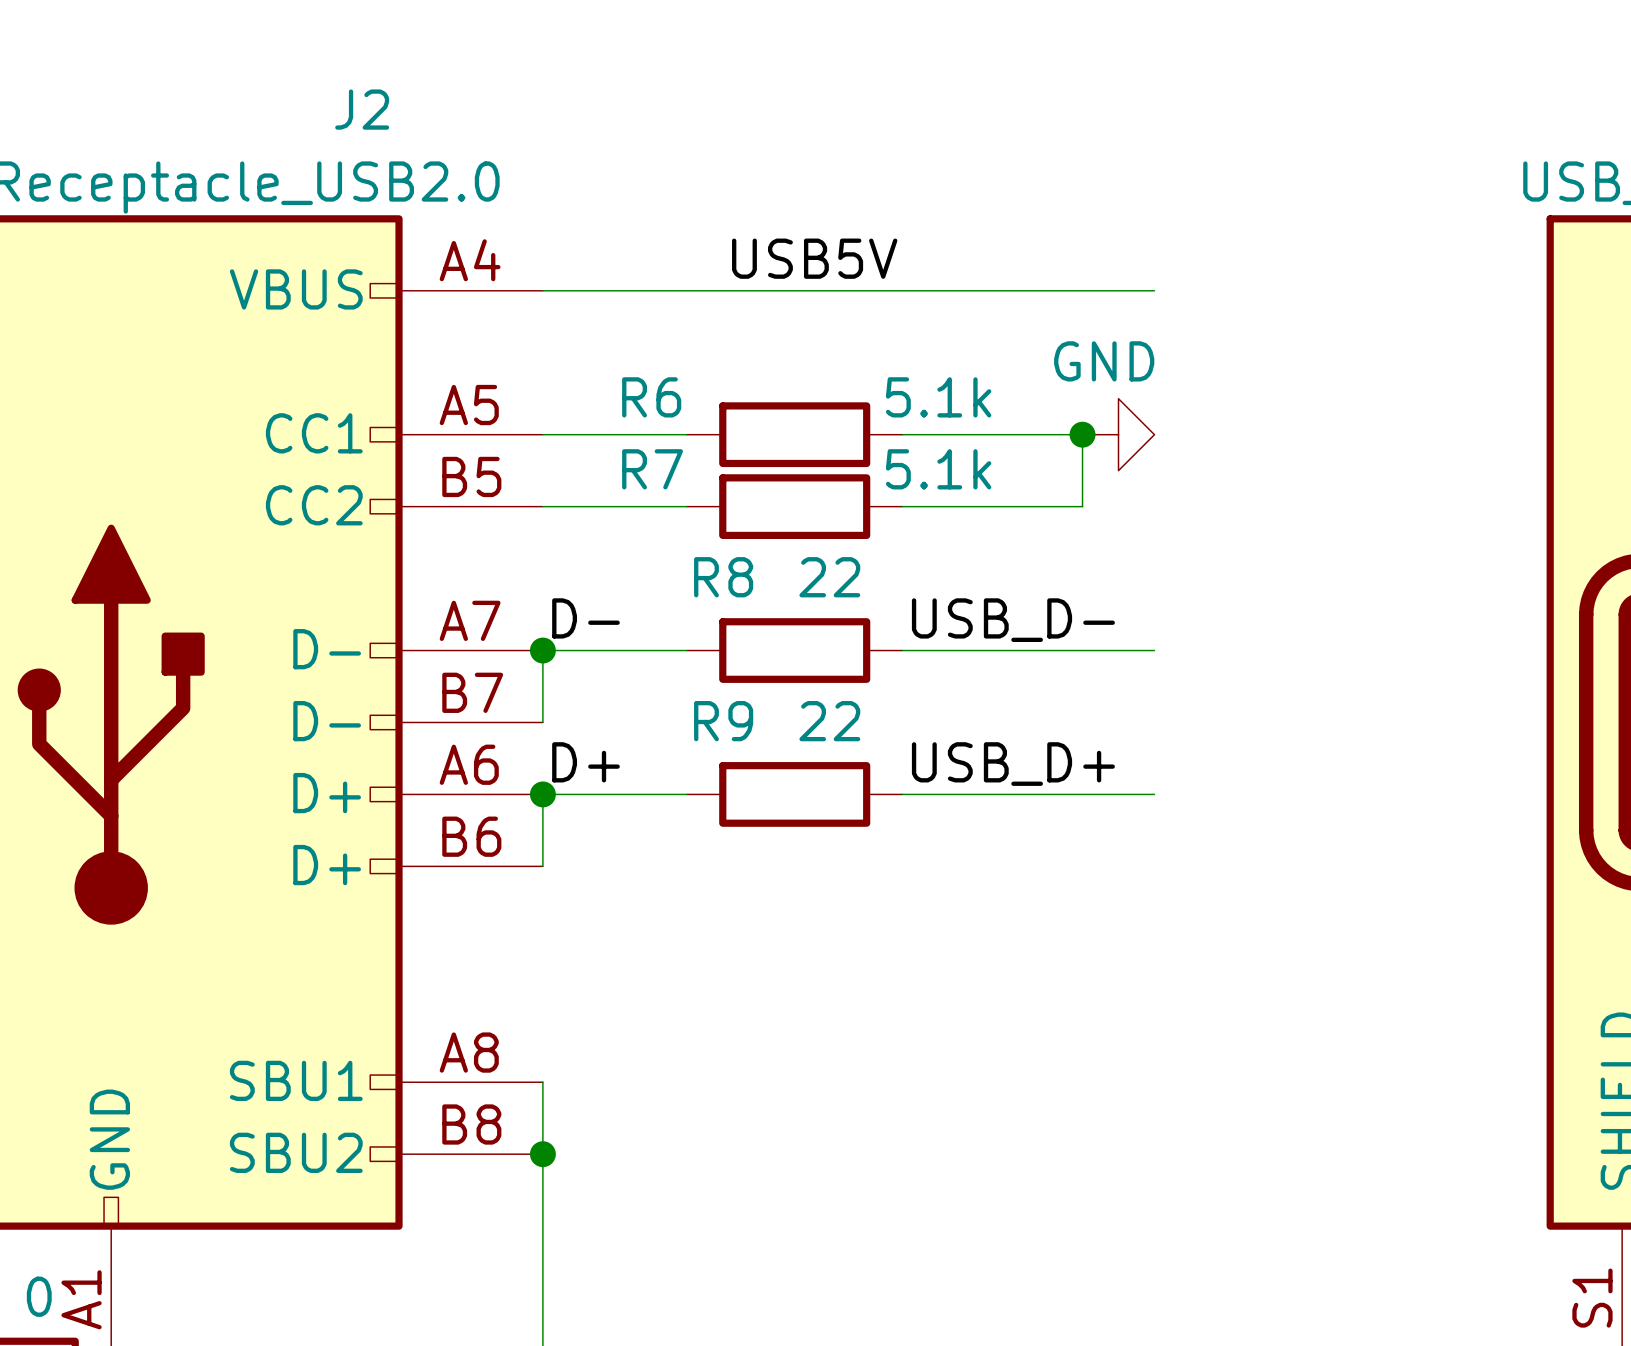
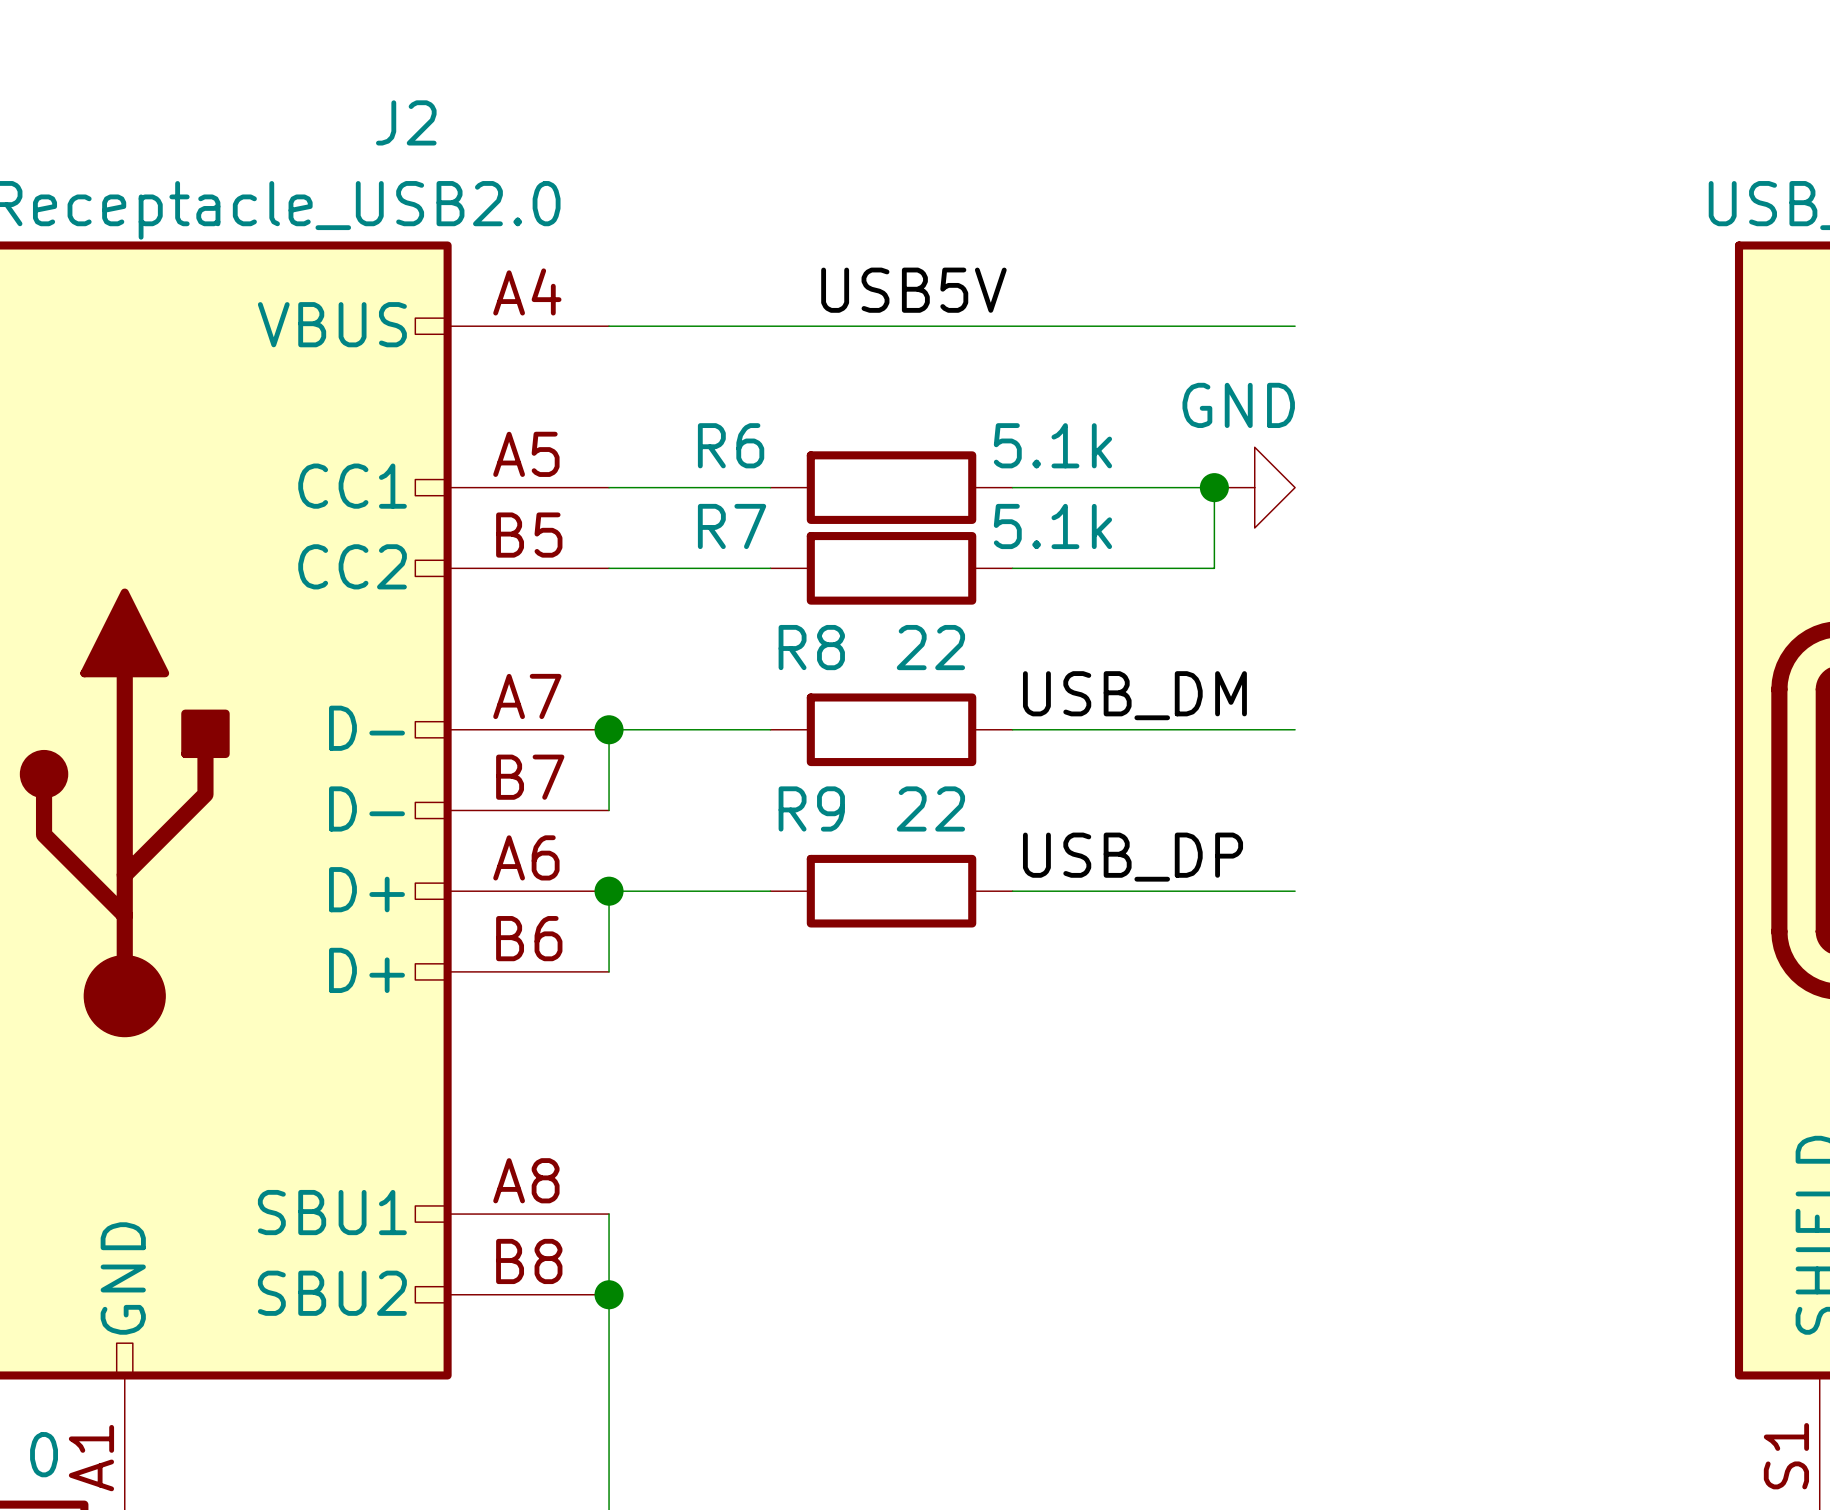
label: D- (586, 618) -> none
label: USB_D- (1013, 620) -> USB_DM (1134, 695)
label: D+ (586, 762) -> none
label: USB_D+ (1013, 764) -> USB_DP (1133, 857)

